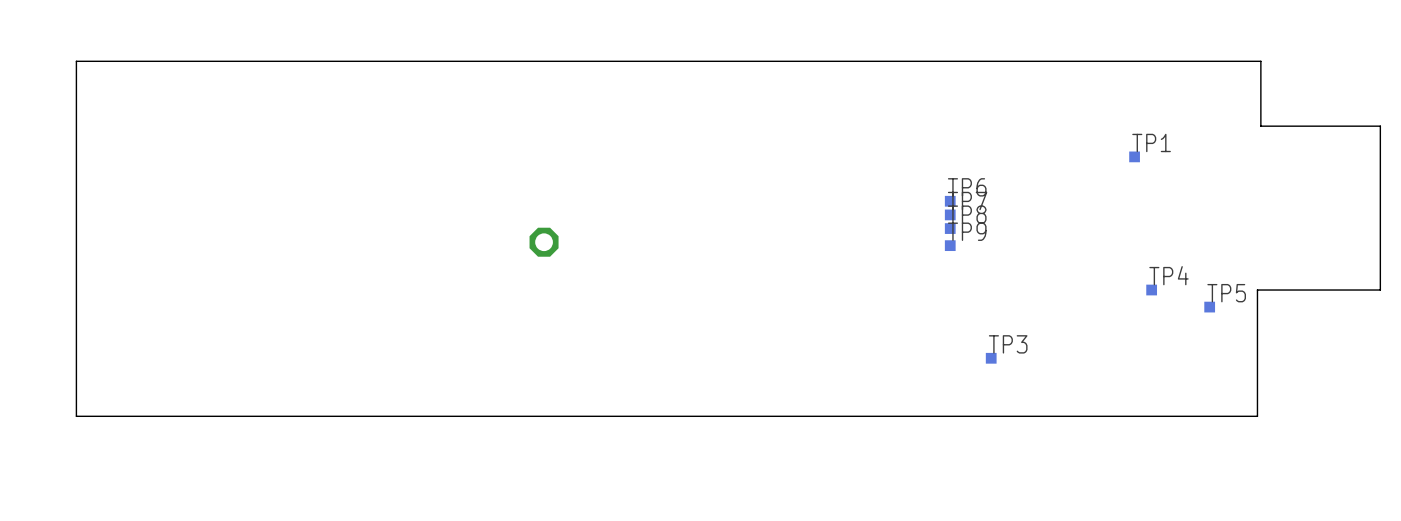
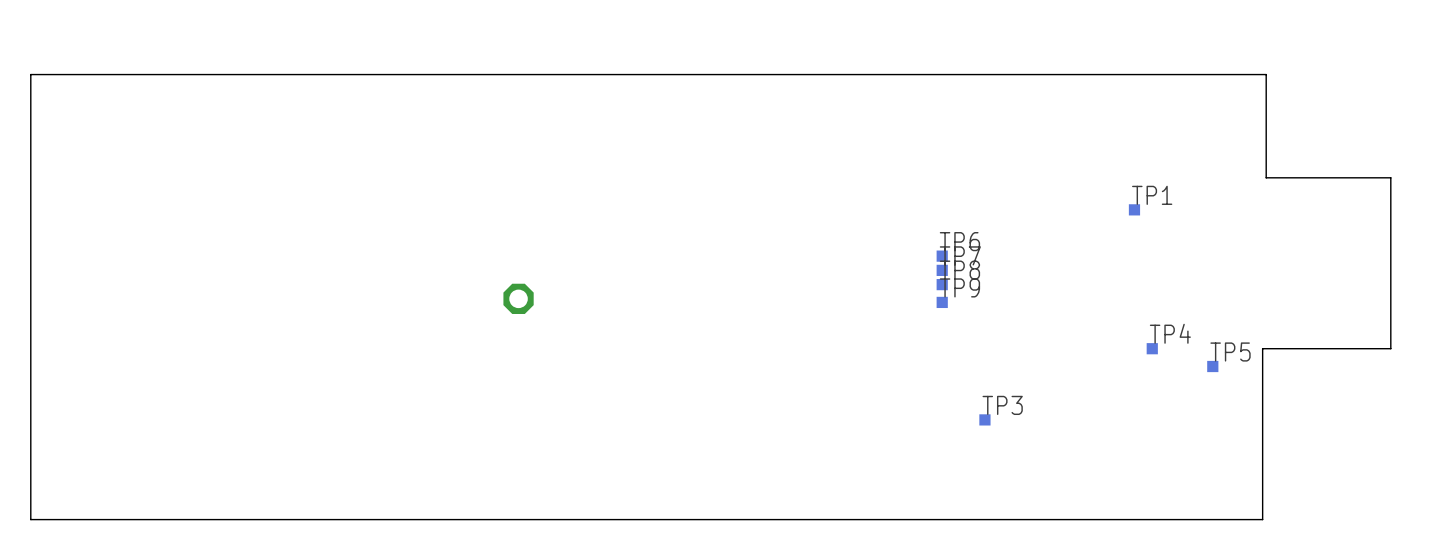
board edge: (1260, 61) (76, 61) -> (1266, 110) (1266, 74) (30, 74) (30, 110)
board edge: (1257, 416) (76, 416) -> (1262, 480) (1262, 519) (30, 519) (30, 480)

